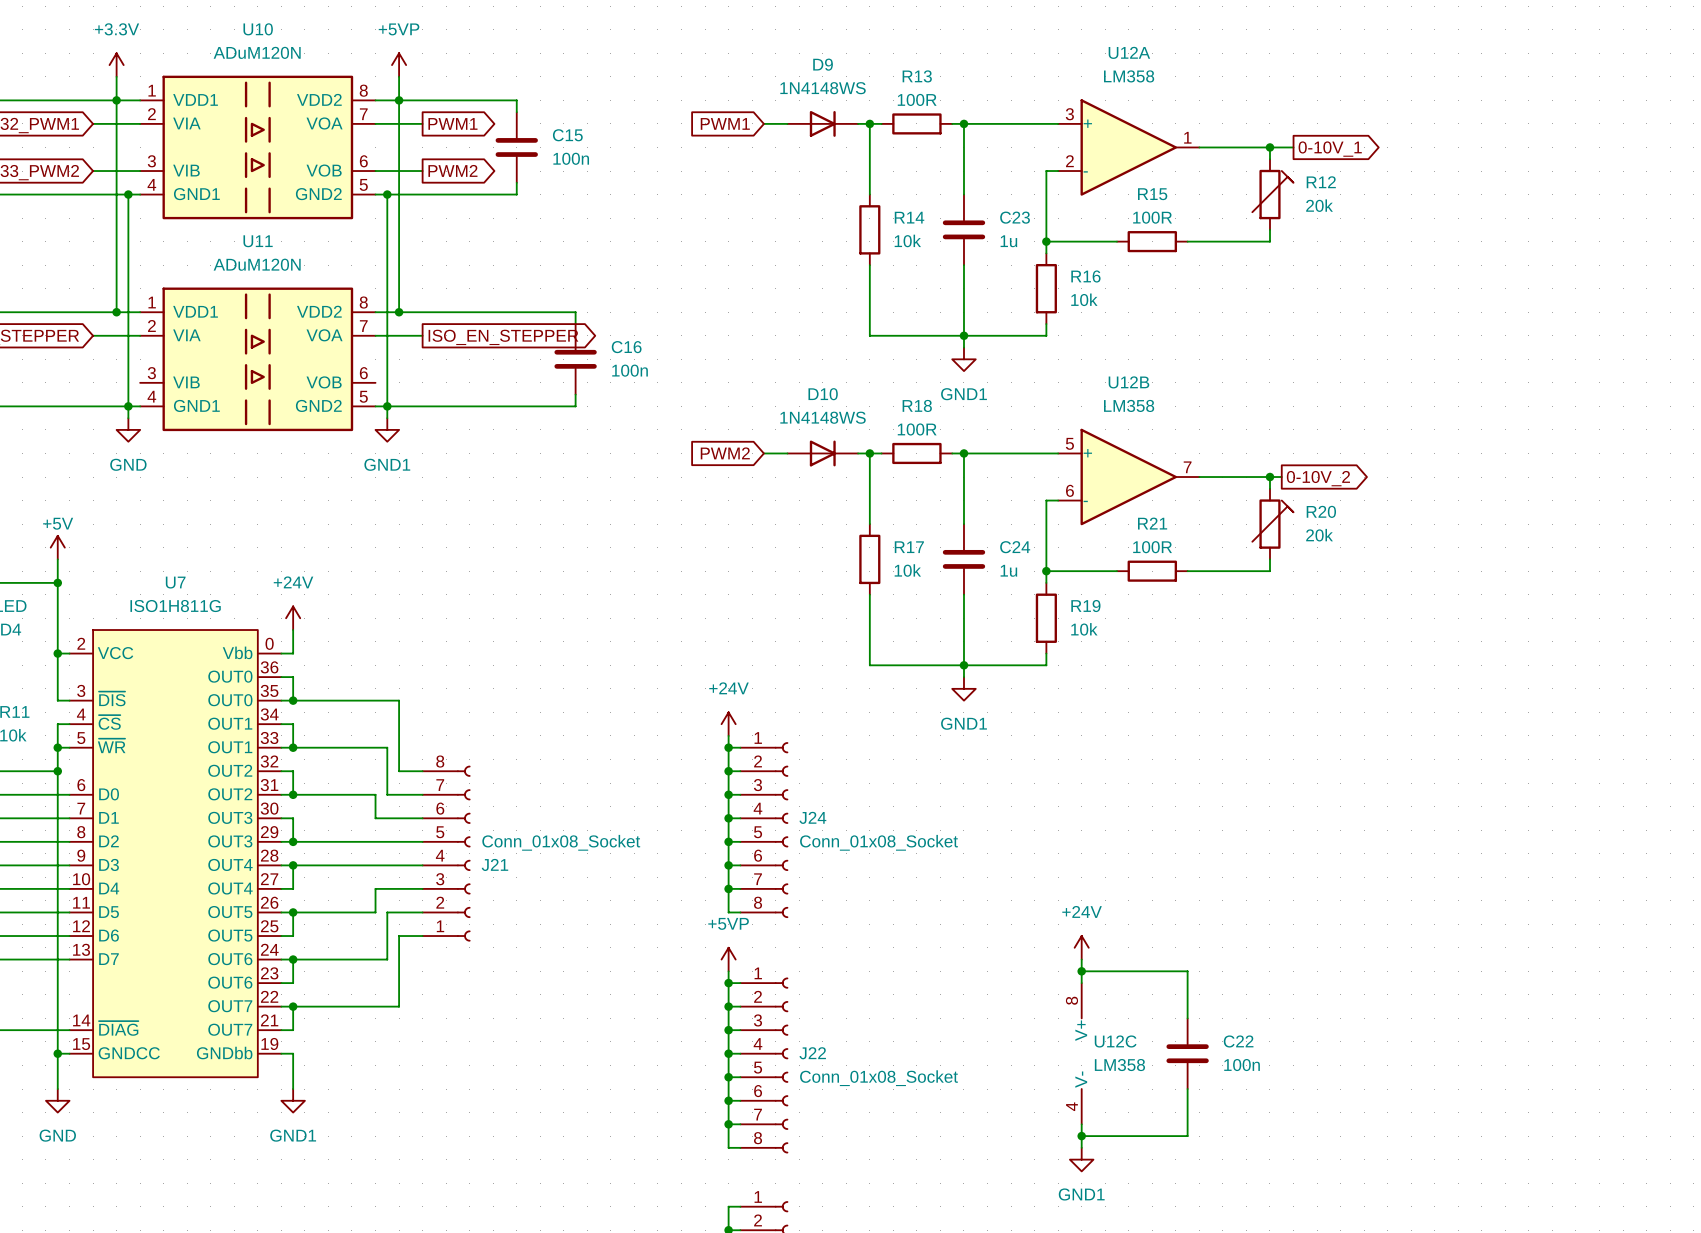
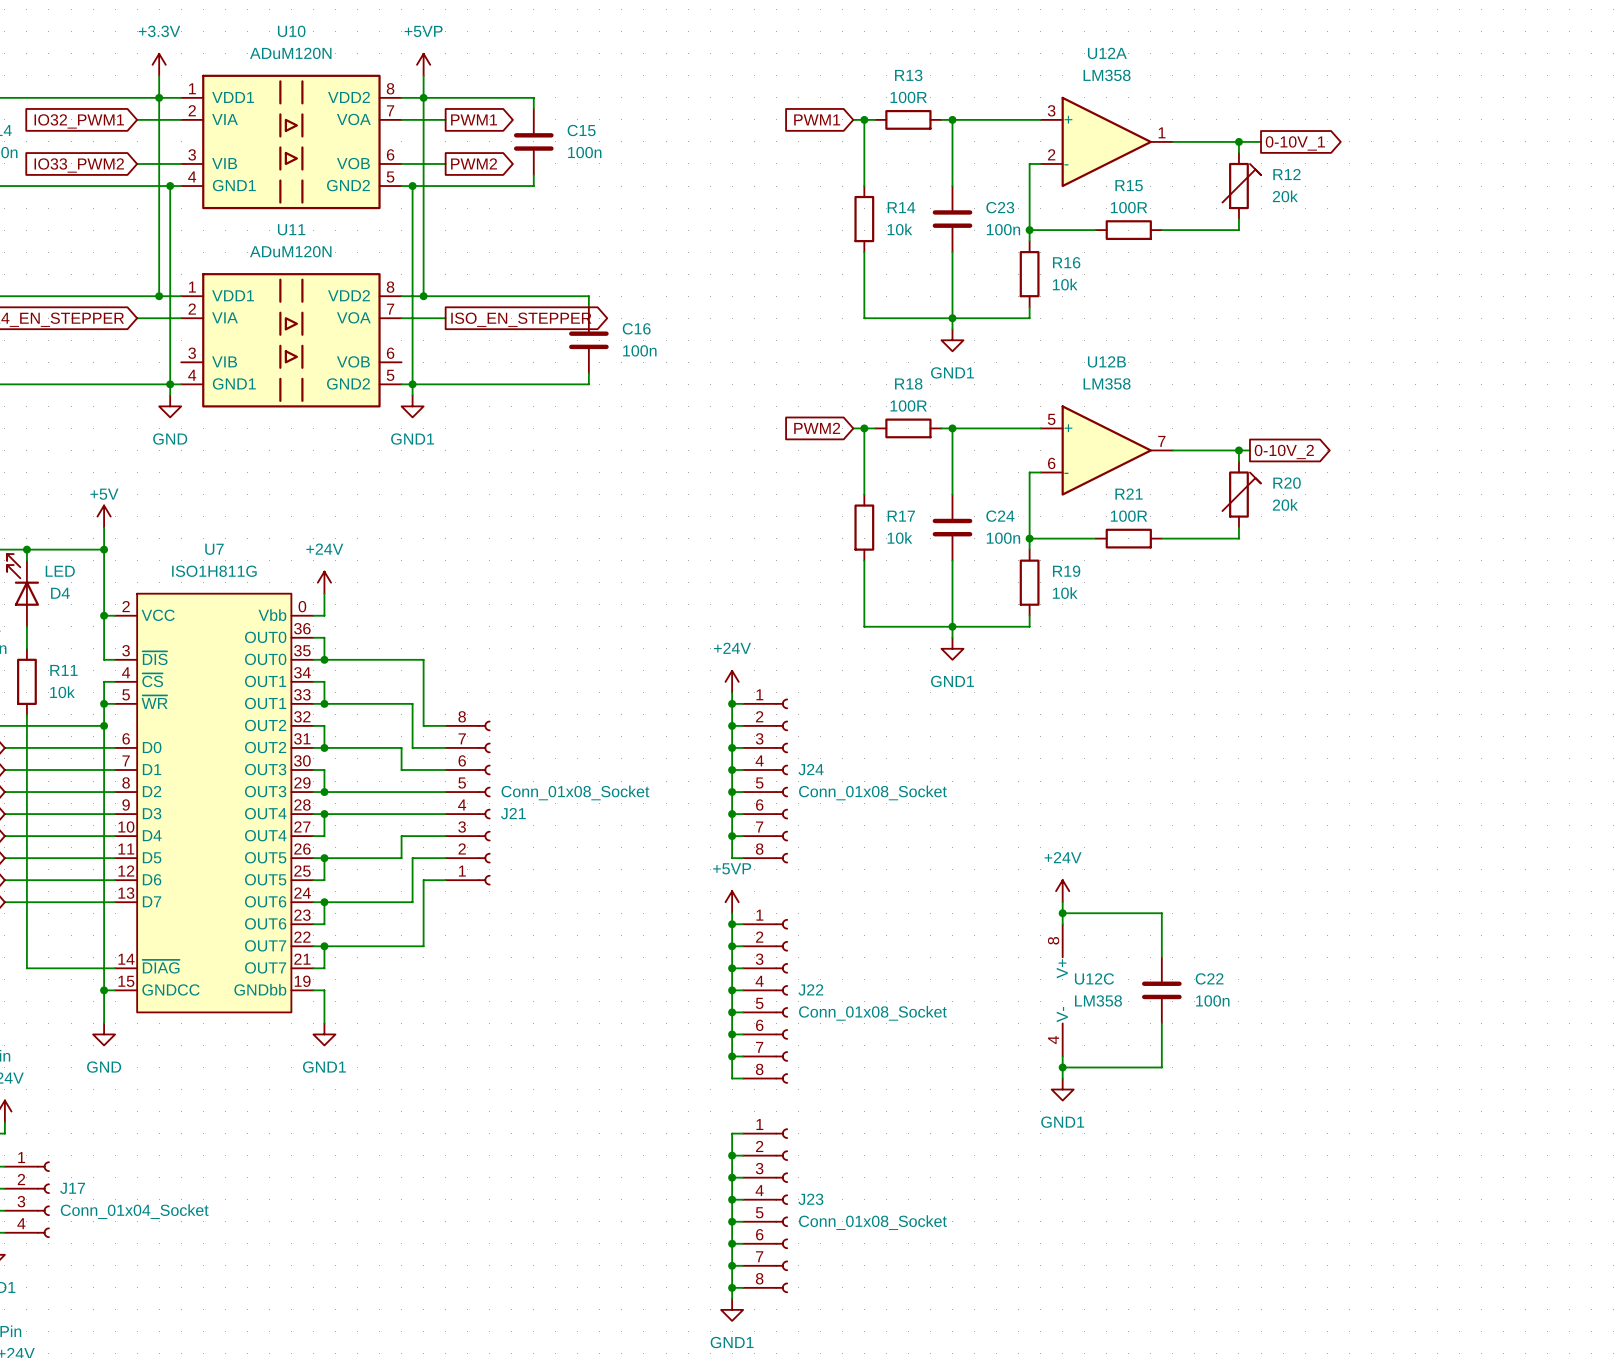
global label position: PWM1 (725, 123) -> PWM1 (817, 119)
wire: (763, 123) (787, 123) -> none
D9: 1N4148WS (822, 123) -> none
C23 value: 1u (1008, 241) -> 100n (1003, 229)
global label position: PWM2 (725, 453) -> PWM2 (817, 428)
wire: (763, 453) (787, 453) -> none
D10: 1N4148WS (822, 453) -> none
C24 value: 1u (1008, 570) -> 100n (1003, 538)

